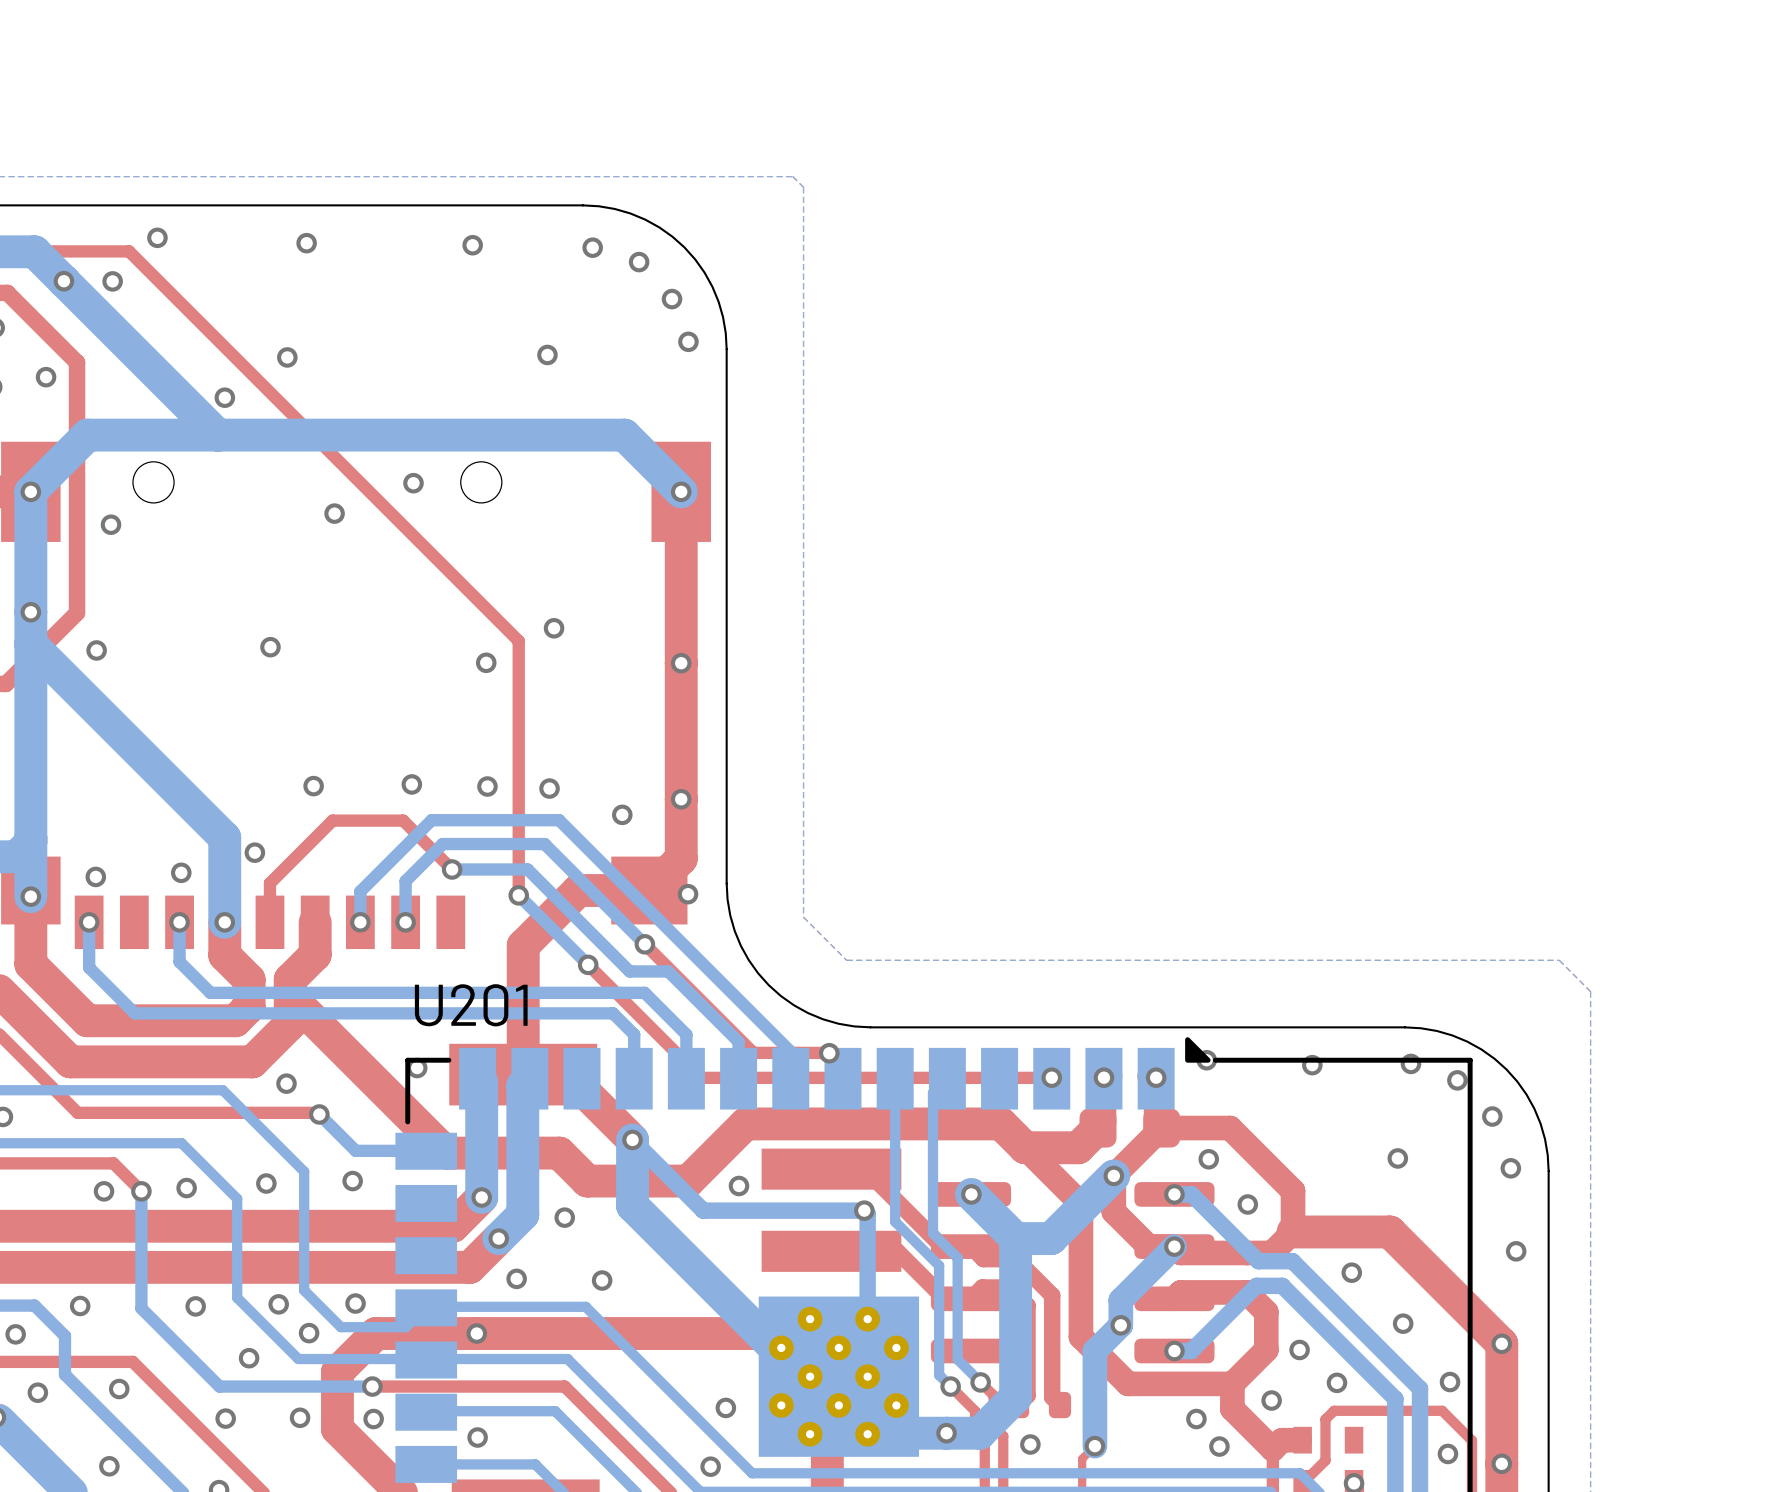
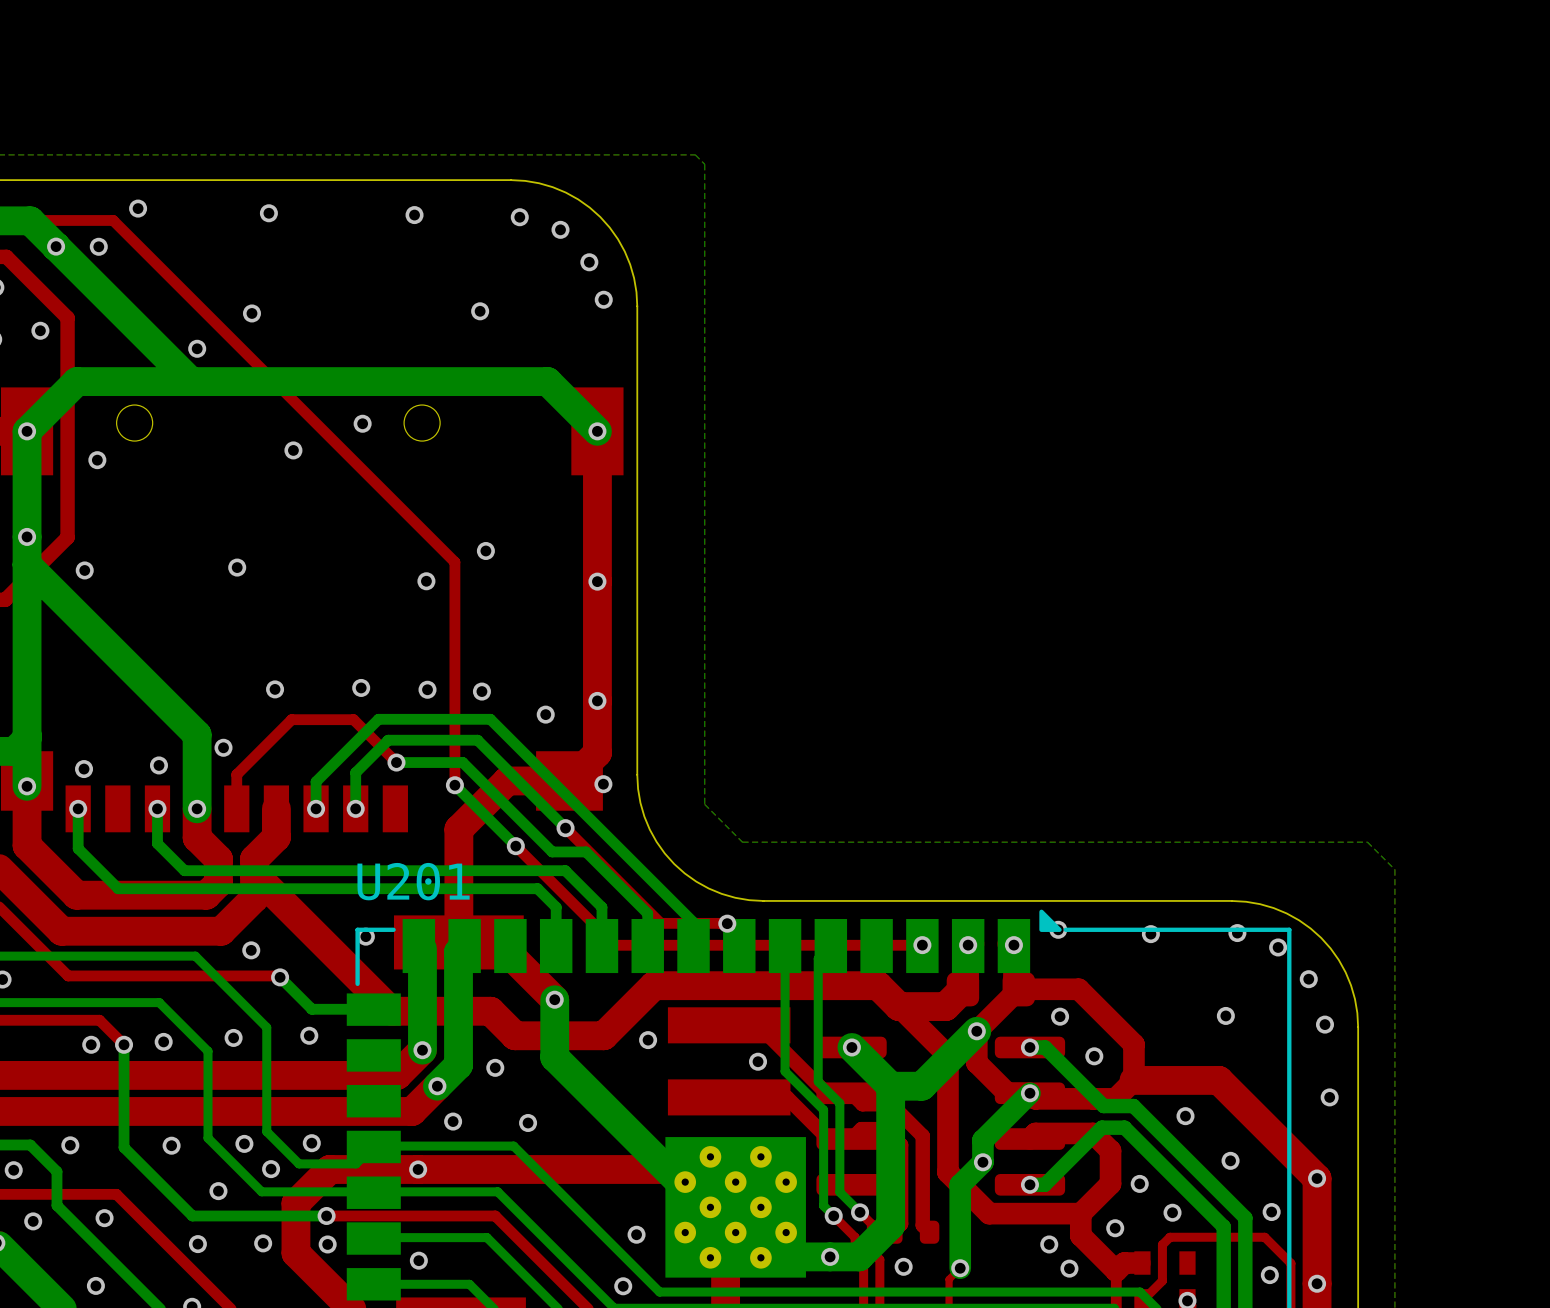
bottom track: (632, 1139) (703, 1210) (864, 1210) (867, 1213) (867, 1319) -> none

